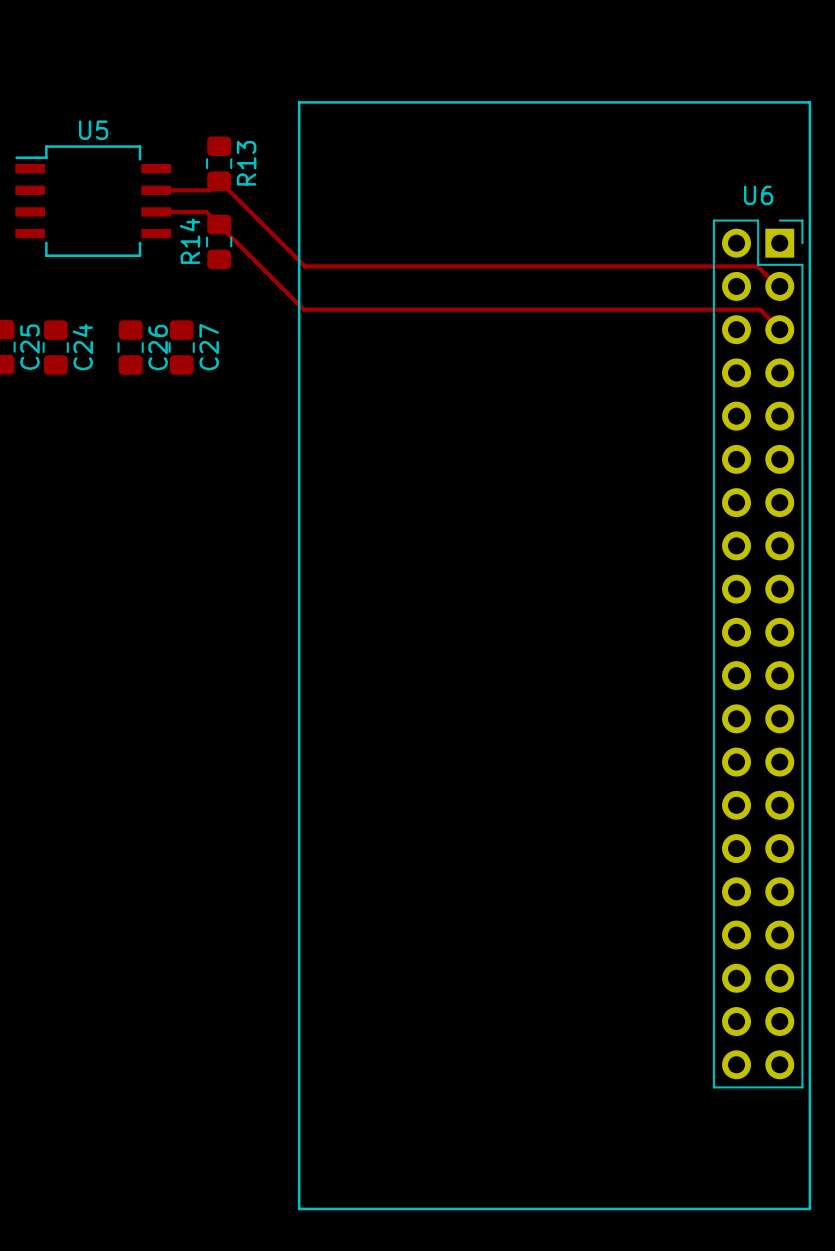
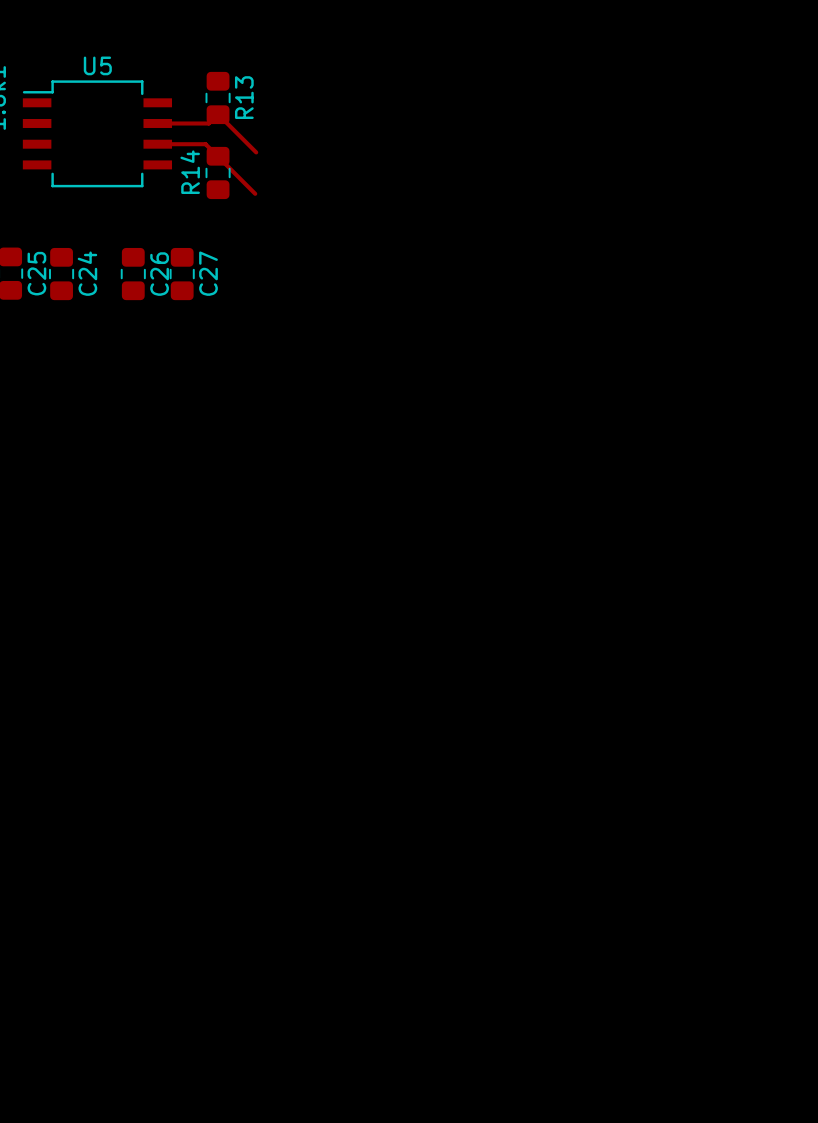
top track: (259, 220) (304, 266) (757, 266) (777, 286) -> none
top track: (257, 263) (303, 309) (760, 309) (780, 330) -> none
U6: (554, 655) -> none

